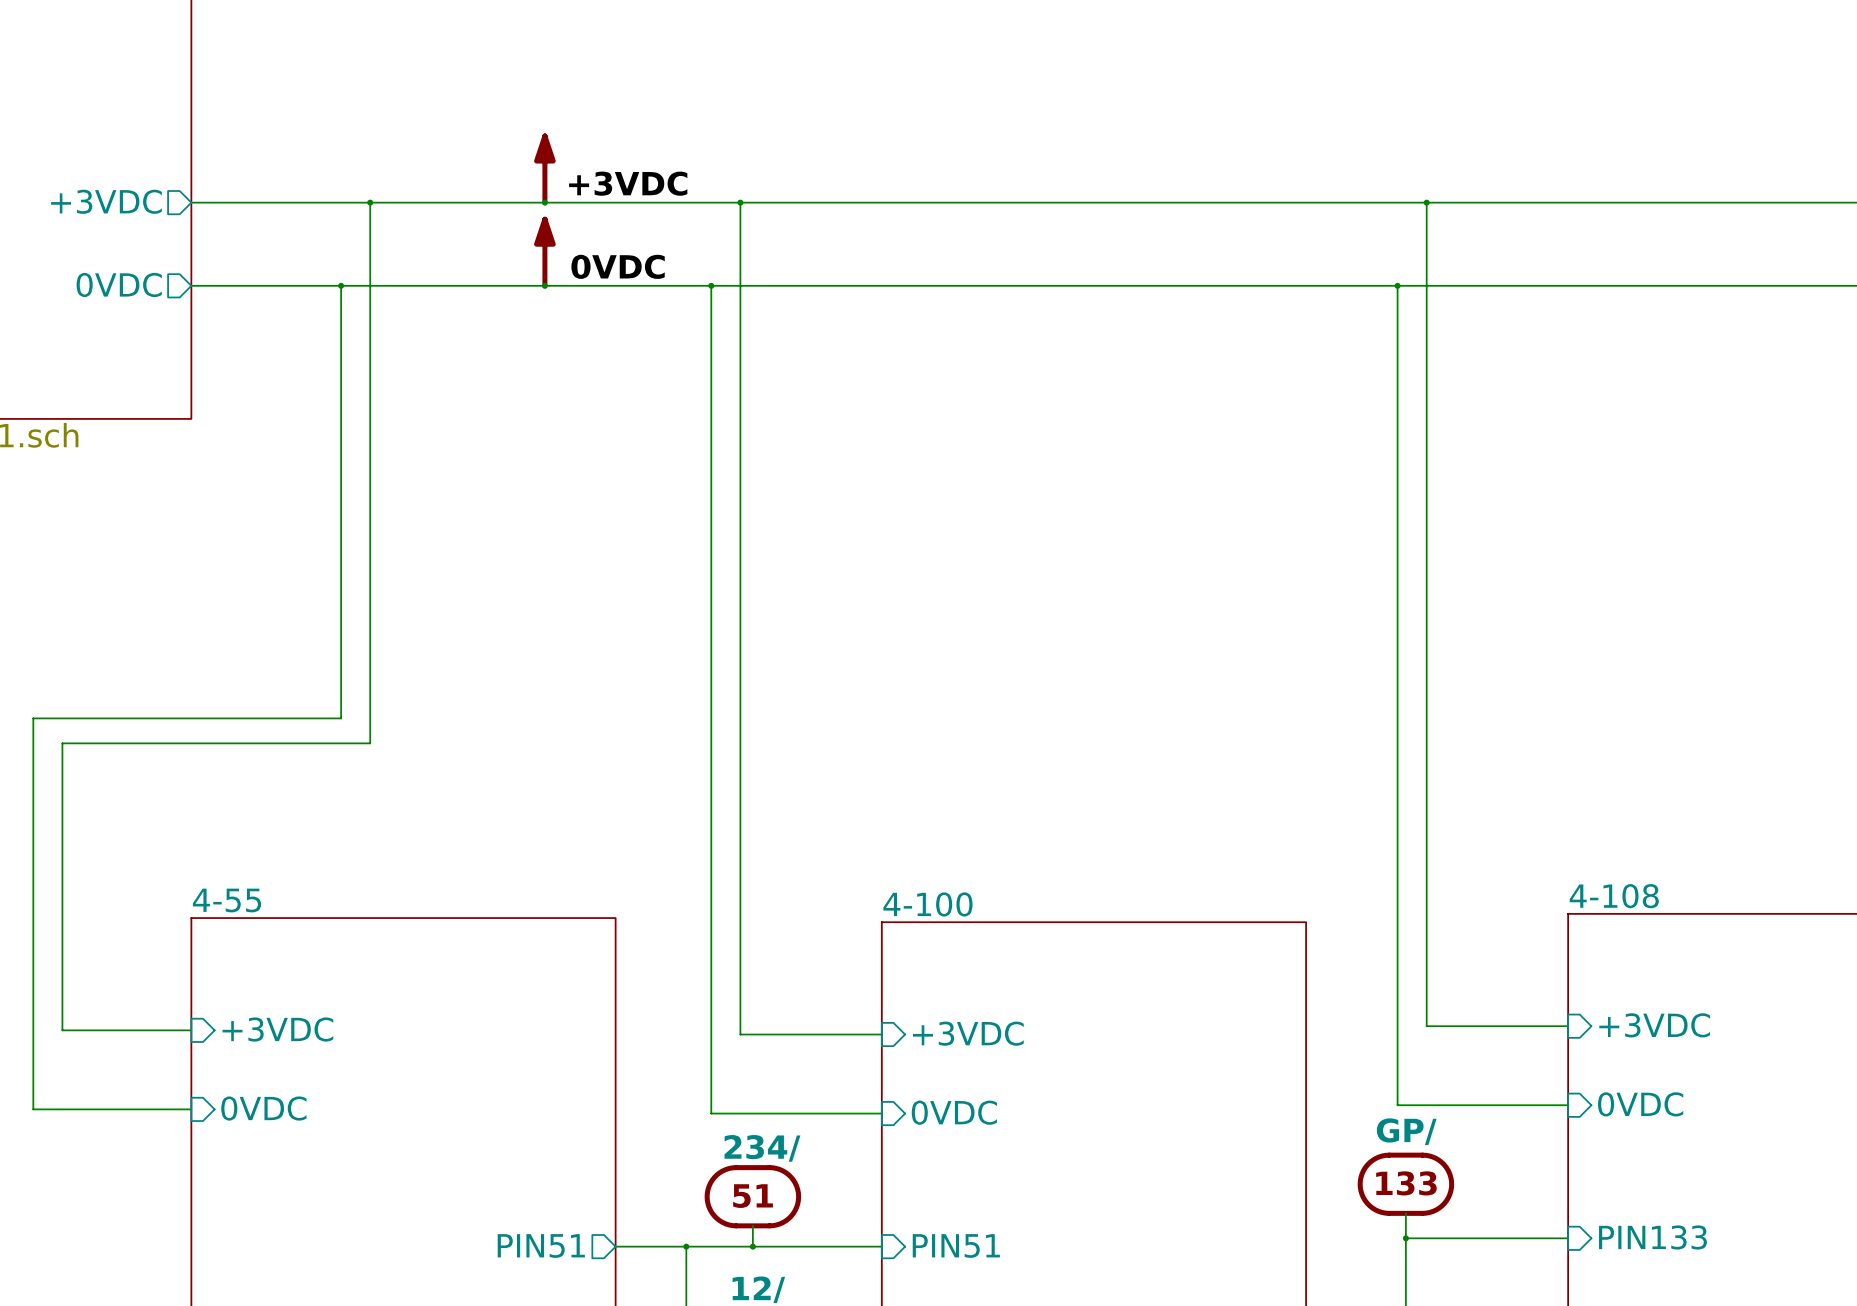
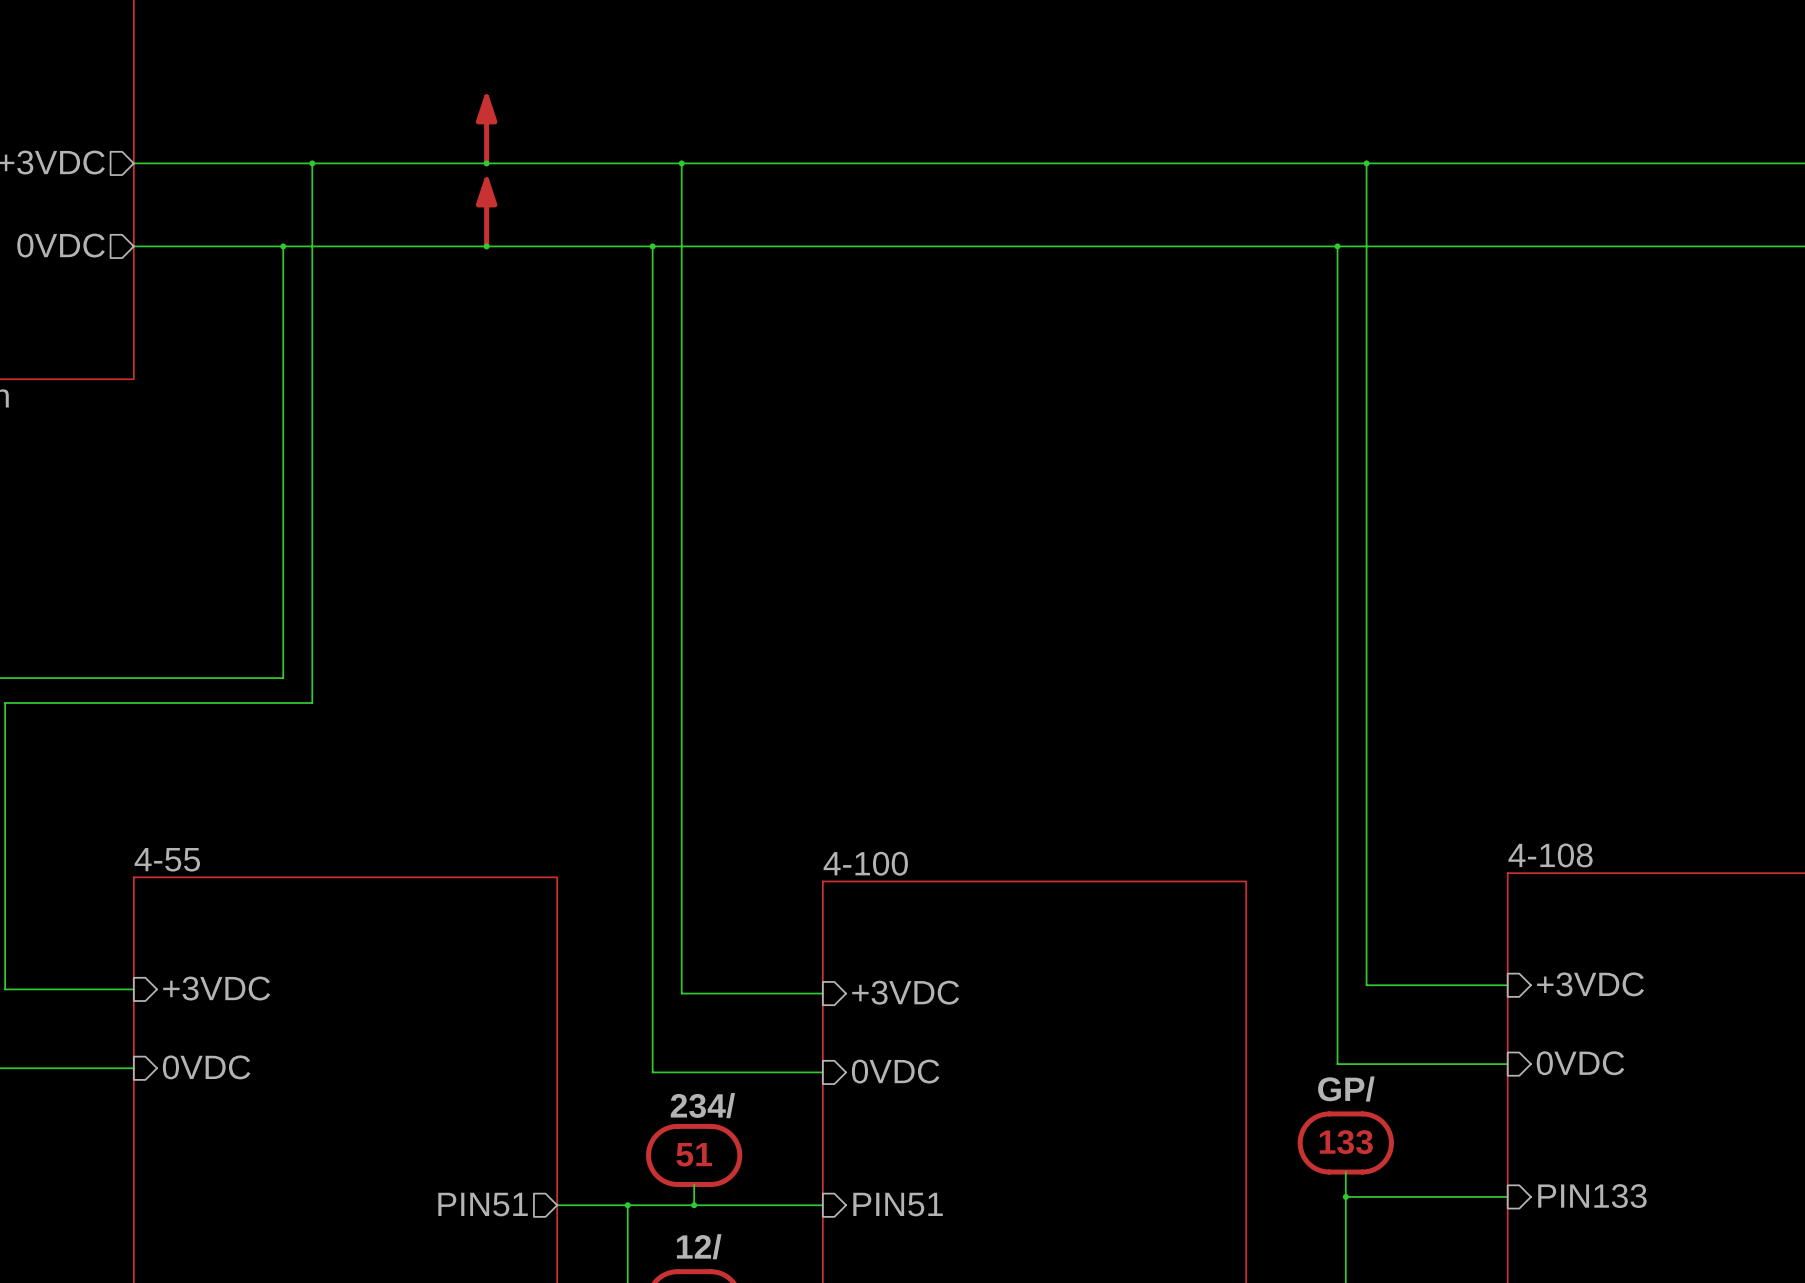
label: +3VDC (628, 183) -> none
label: 0VDC (618, 266) -> none

